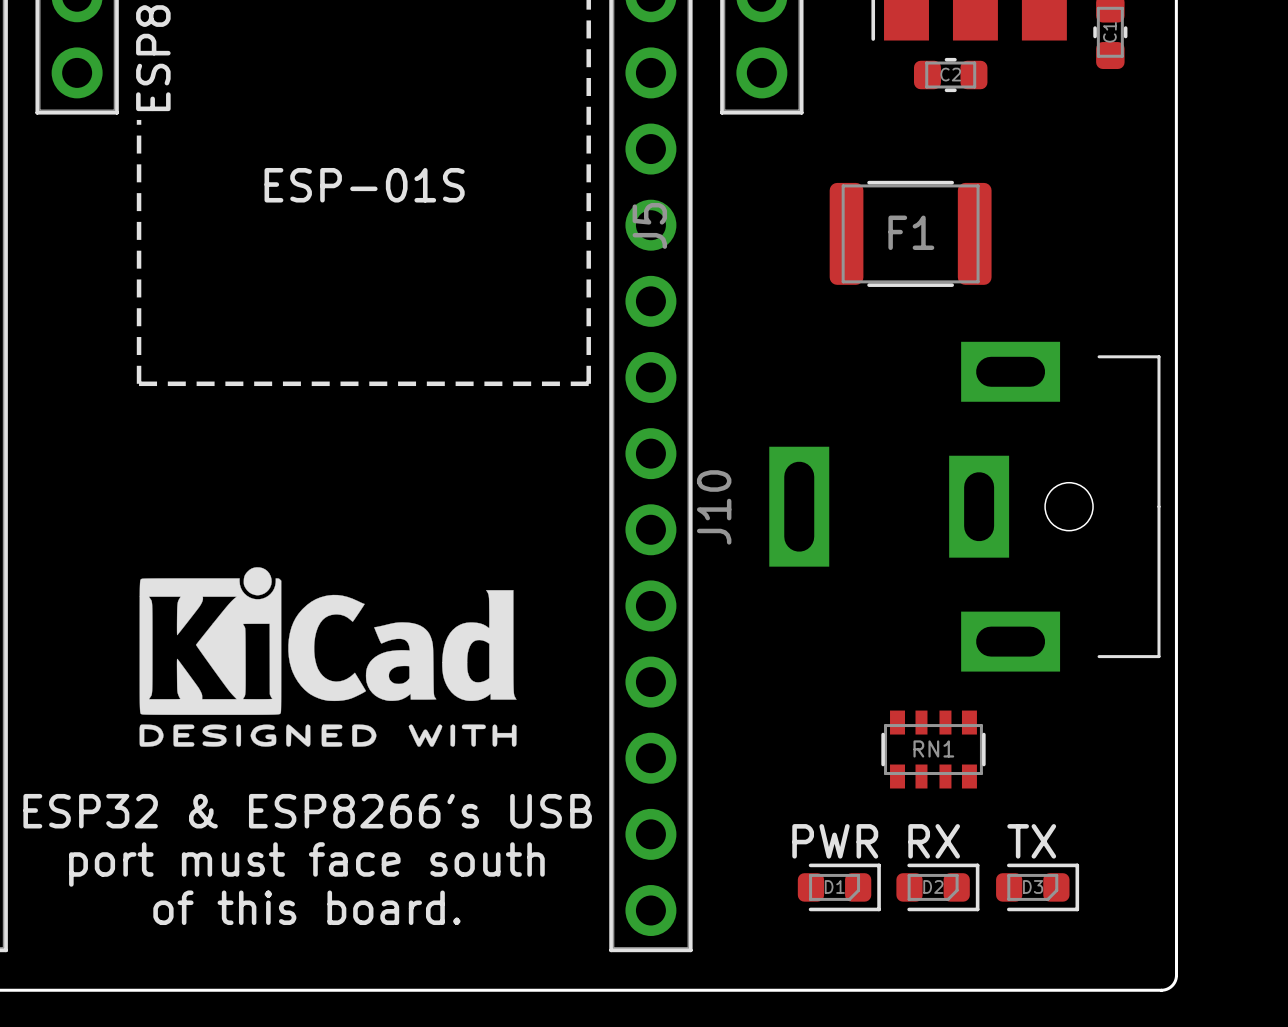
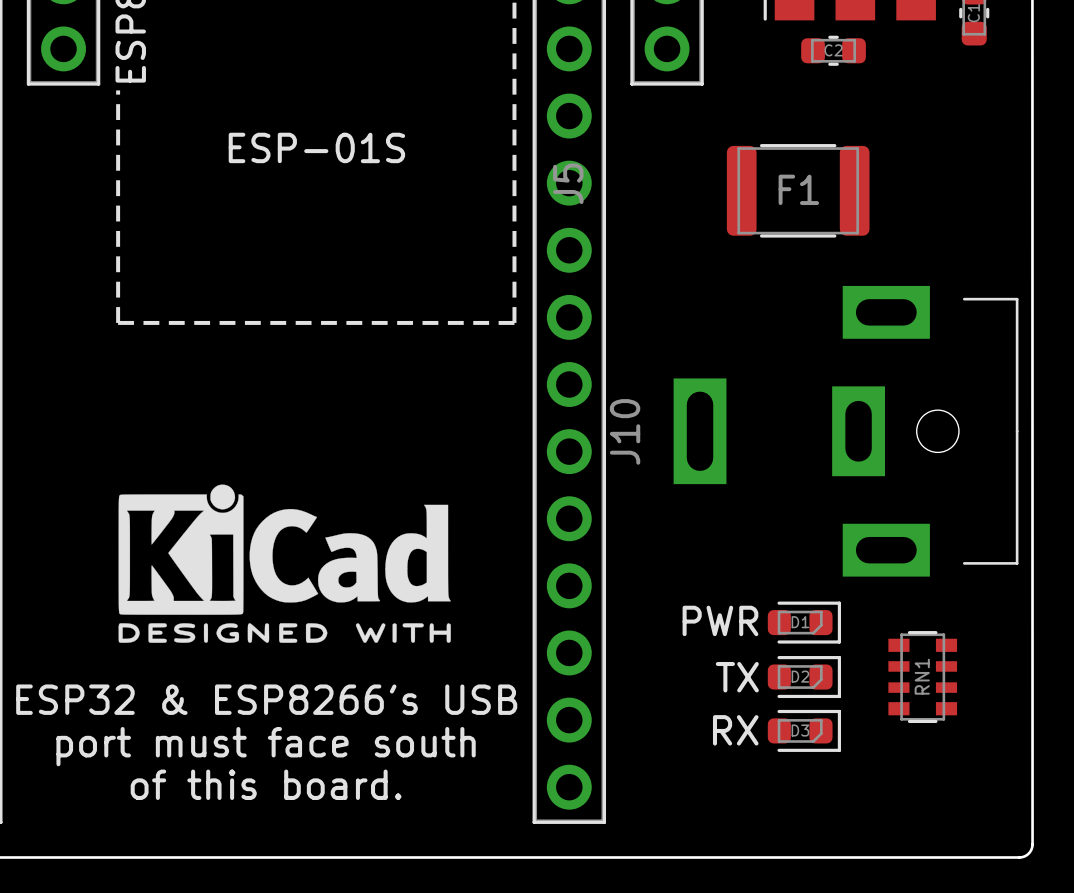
RN1 rotation: 0° (933, 749) -> 90° clockwise (922, 677)
RN1 position: (933, 749) -> (922, 677)
text position: PWR (835, 841) -> PWR (720, 620)
text position: RX (934, 841) -> RX (735, 730)
text position: TX (1031, 841) -> TX (737, 677)
D1 position: (839, 887) -> (804, 622)
D2 position: (937, 887) -> (804, 677)
D3 position: (1037, 887) -> (804, 730)

